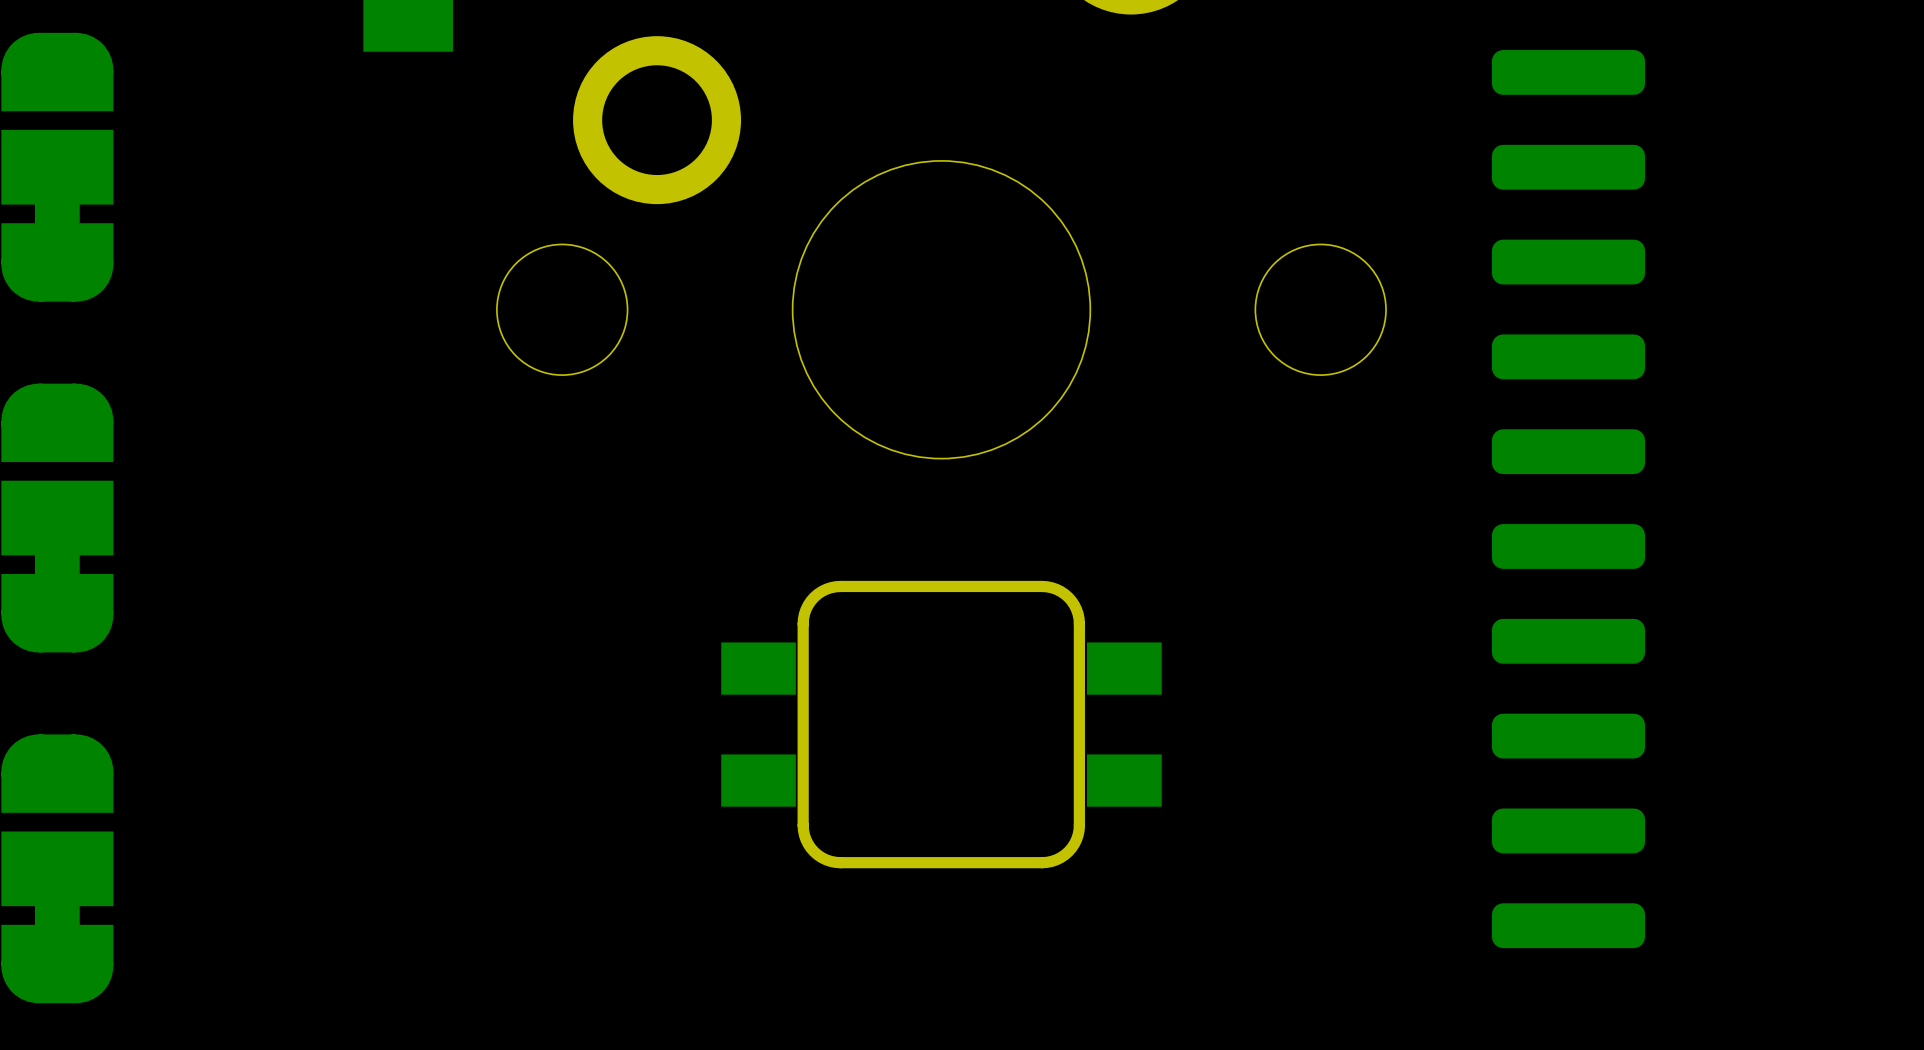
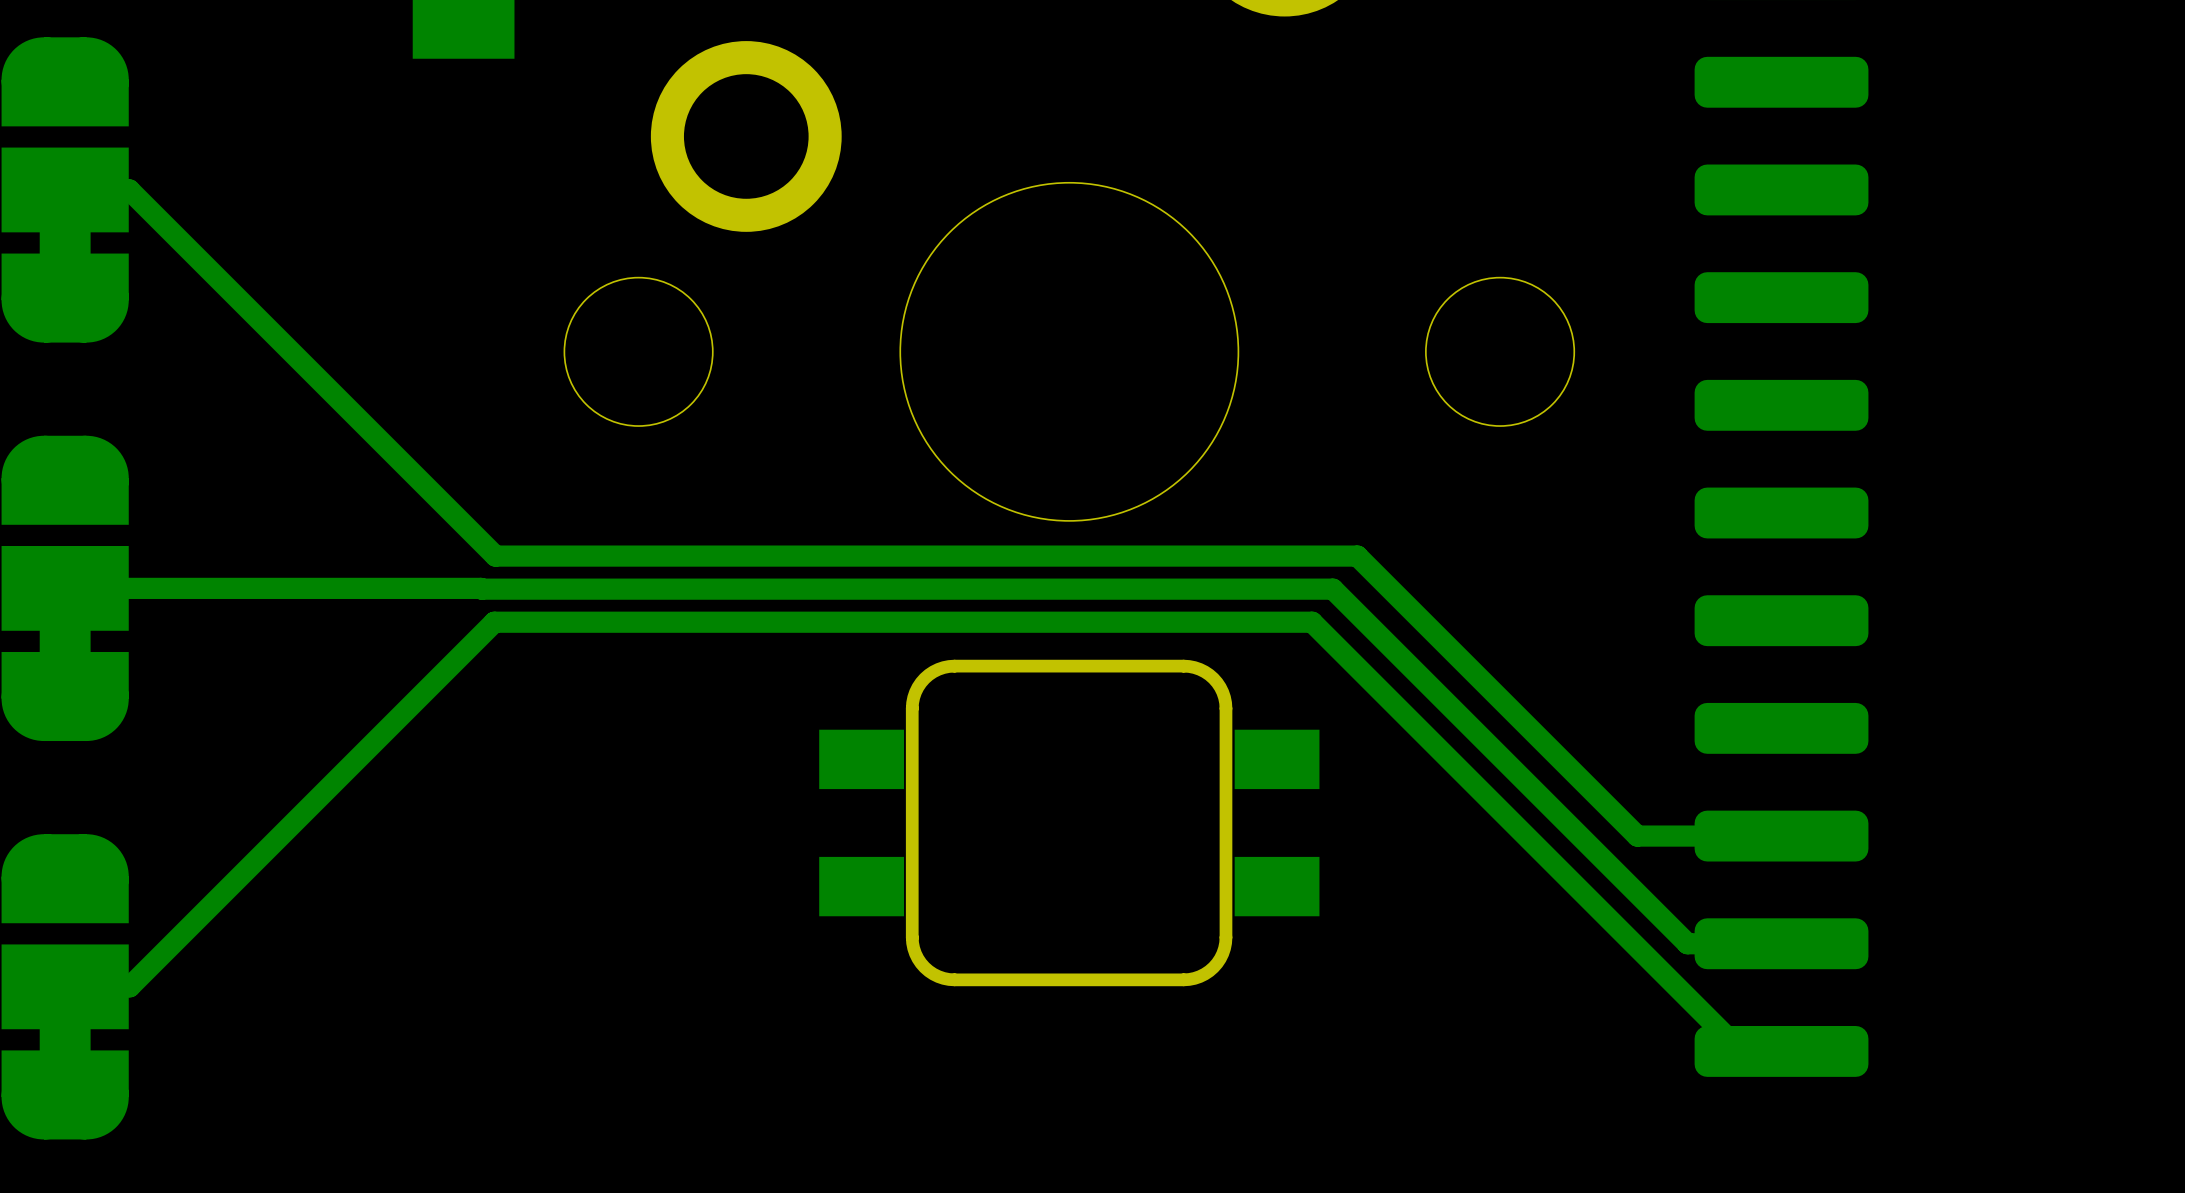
bottom track: none -> (65, 189) (129, 189) (495, 556) (1357, 556) (1637, 836) (1781, 836)
bottom track: none -> (65, 588) (481, 588)
bottom track: none -> (481, 589) (1332, 589) (1687, 943) (1781, 943)
bottom track: none -> (65, 986) (129, 986) (494, 622) (1312, 622) (1741, 1051) (1781, 1051)

